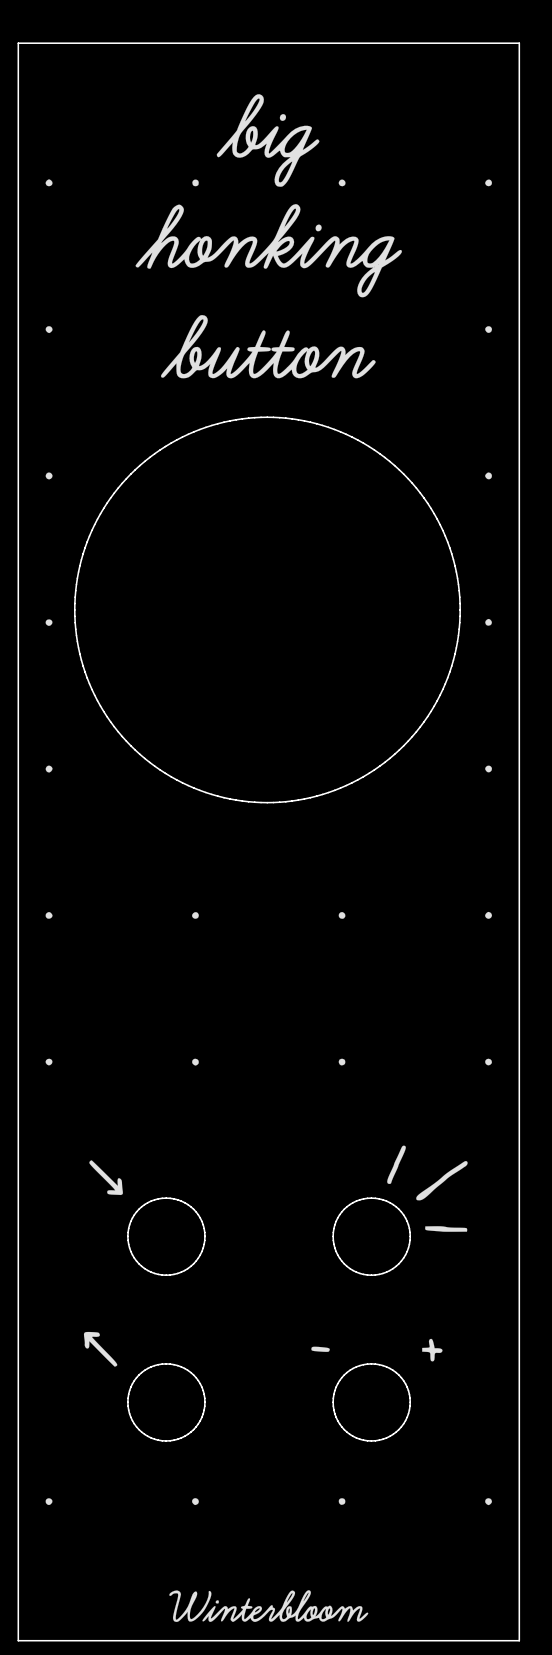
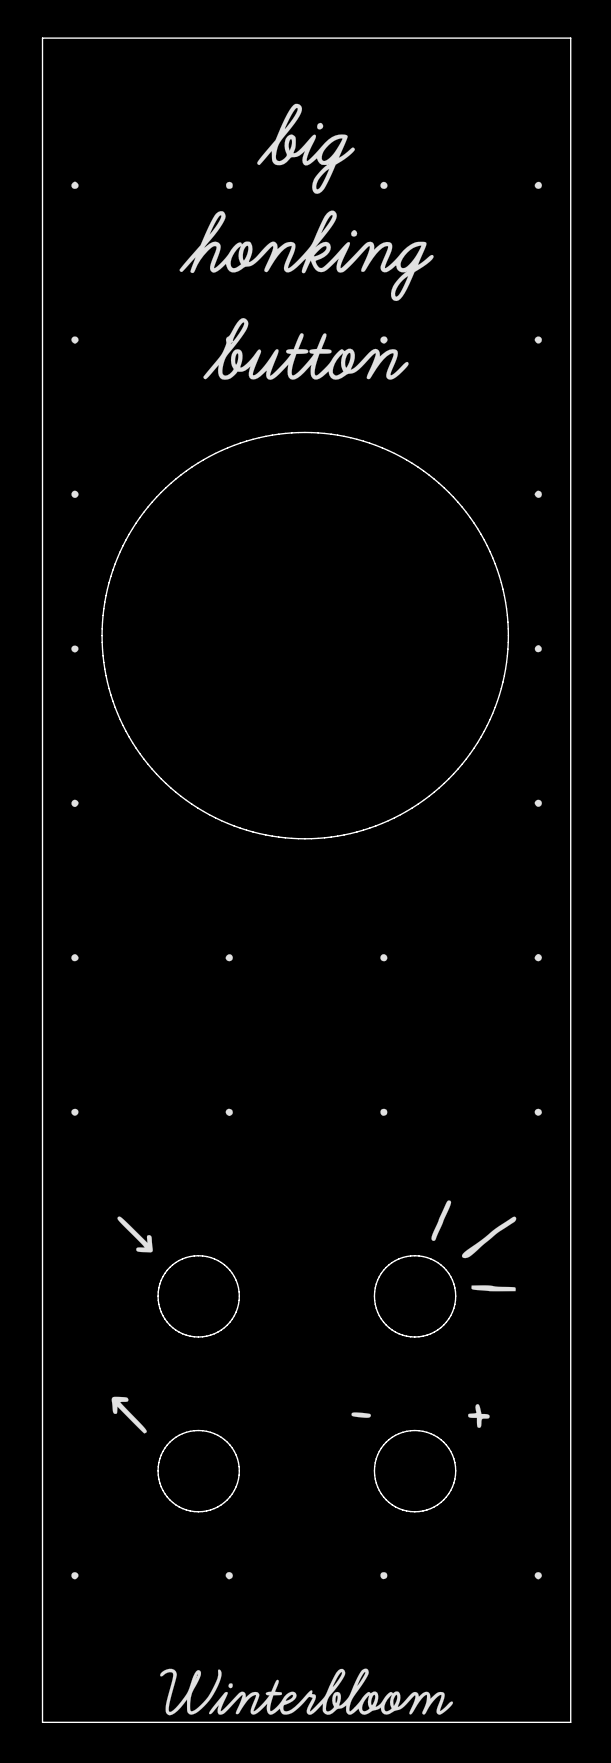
drawing shape: [45, 94, 493, 1622] -> [71, 103, 542, 1716]

